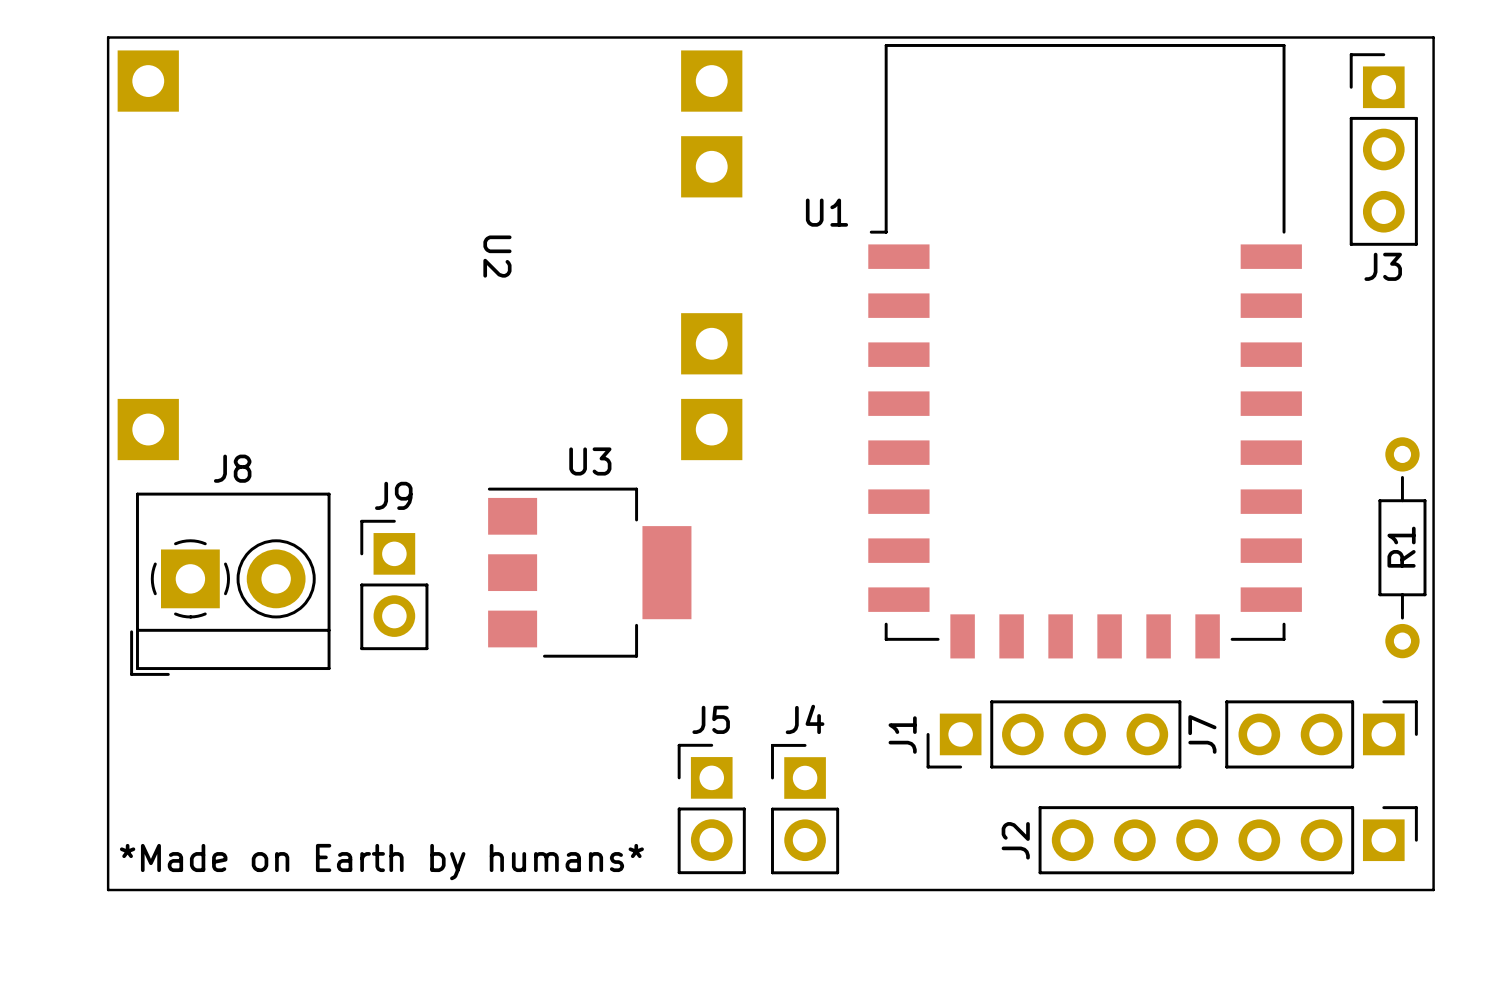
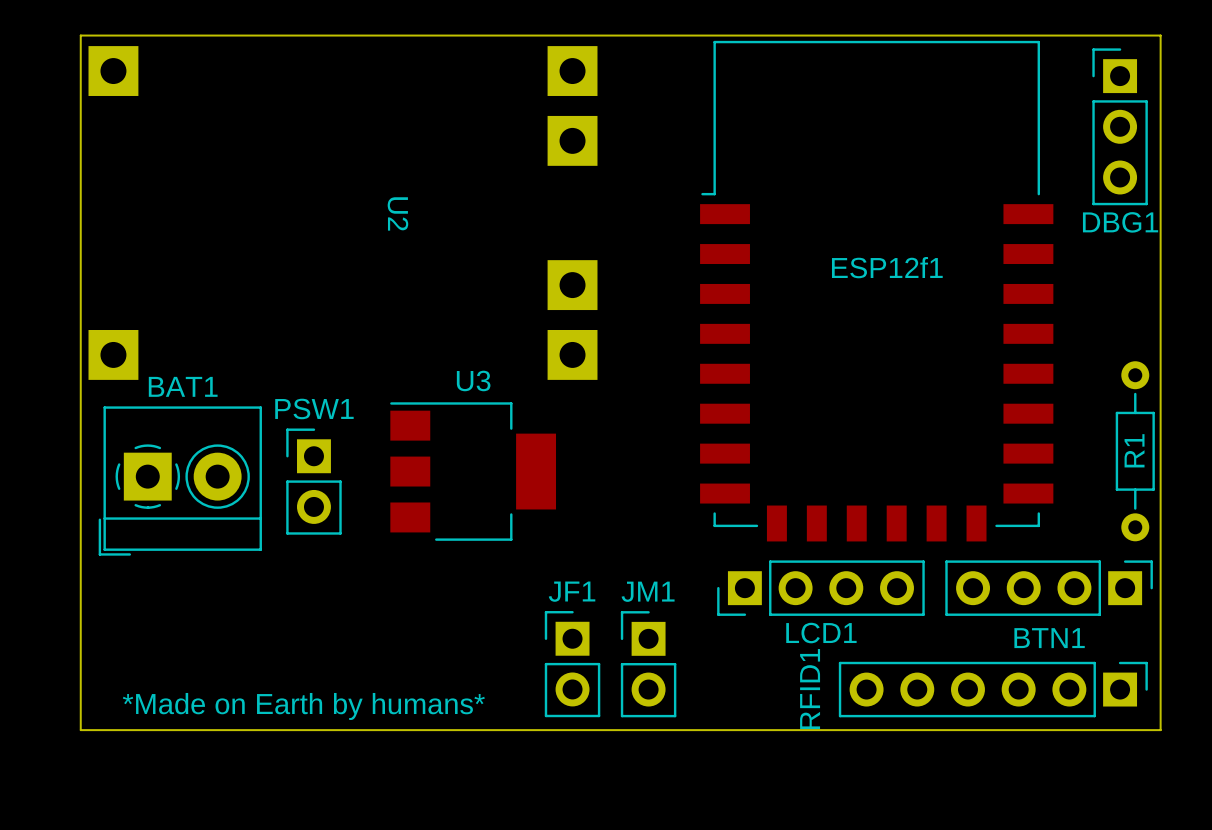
U1 name: U1 (826, 212) -> ESP12f1 (887, 267)
J3 name: J3 (1383, 266) -> DBG1 (1120, 222)
J8 name: J8 (232, 468) -> BAT1 (183, 386)
J9 name: J9 (393, 495) -> PSW1 (314, 408)
LCD1: none -> (820, 588)
BTN1: none -> (1049, 588)
J5 name: J5 (711, 719) -> JF1 (572, 591)
J4 name: J4 (805, 719) -> JM1 (648, 591)
J1: (1053, 734) -> none
J7: (1321, 734) -> none
J2 name: J2 (1015, 840) -> RFID1 (810, 689)

